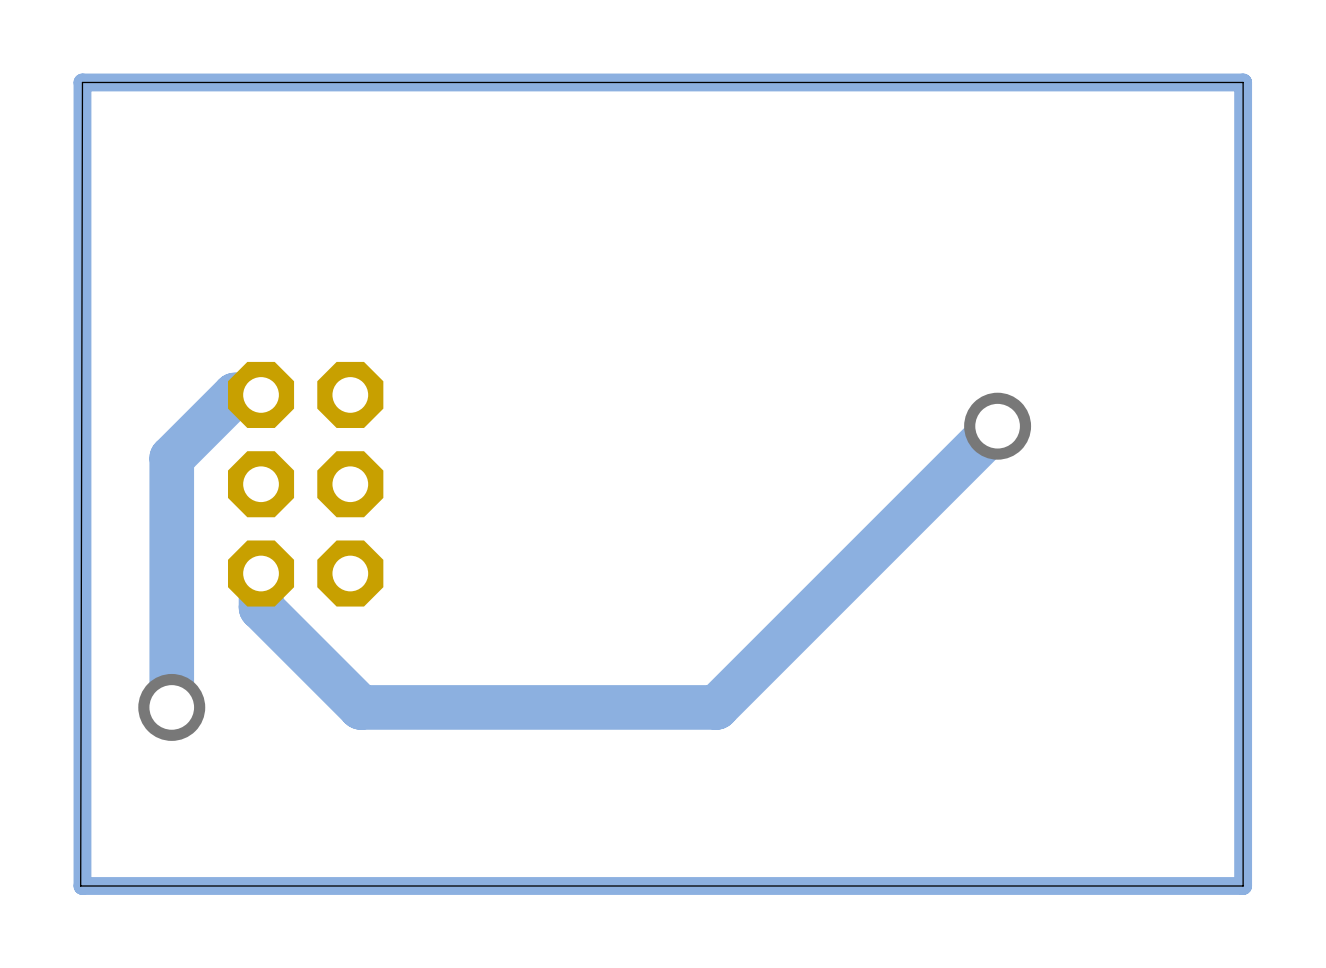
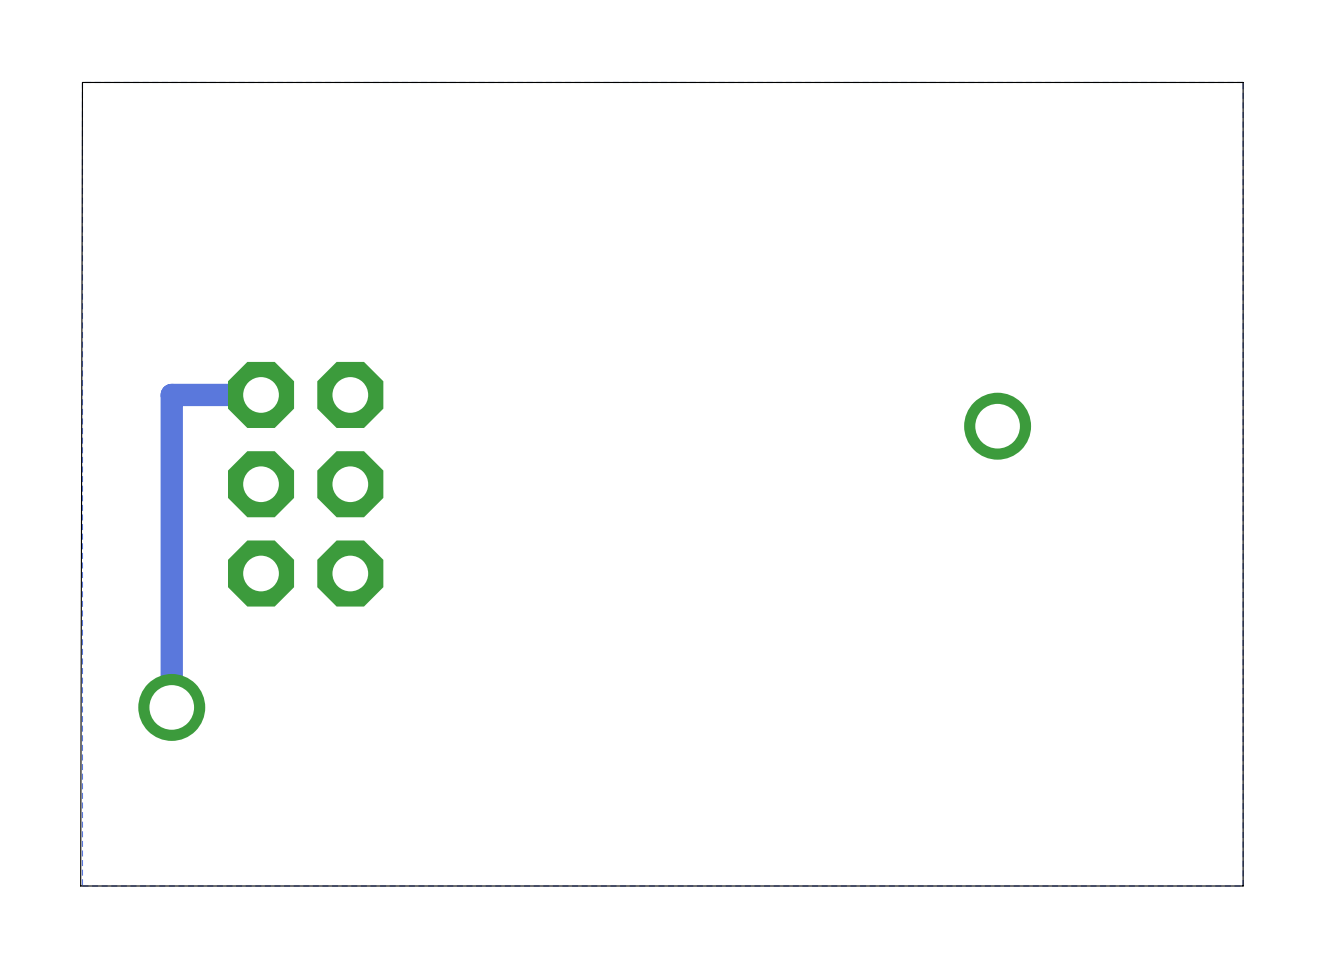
track: (1243, 82) (82, 82) (82, 886) (1243, 886) (1243, 82) -> none
track: (234, 394) (171, 458) -> (234, 394) (171, 394) (171, 458)
track: (997, 426) (716, 707) (360, 707) (261, 607) (261, 573) -> none
track width: thick (171, 458) (171, 707) -> thin (171, 458) (171, 707)

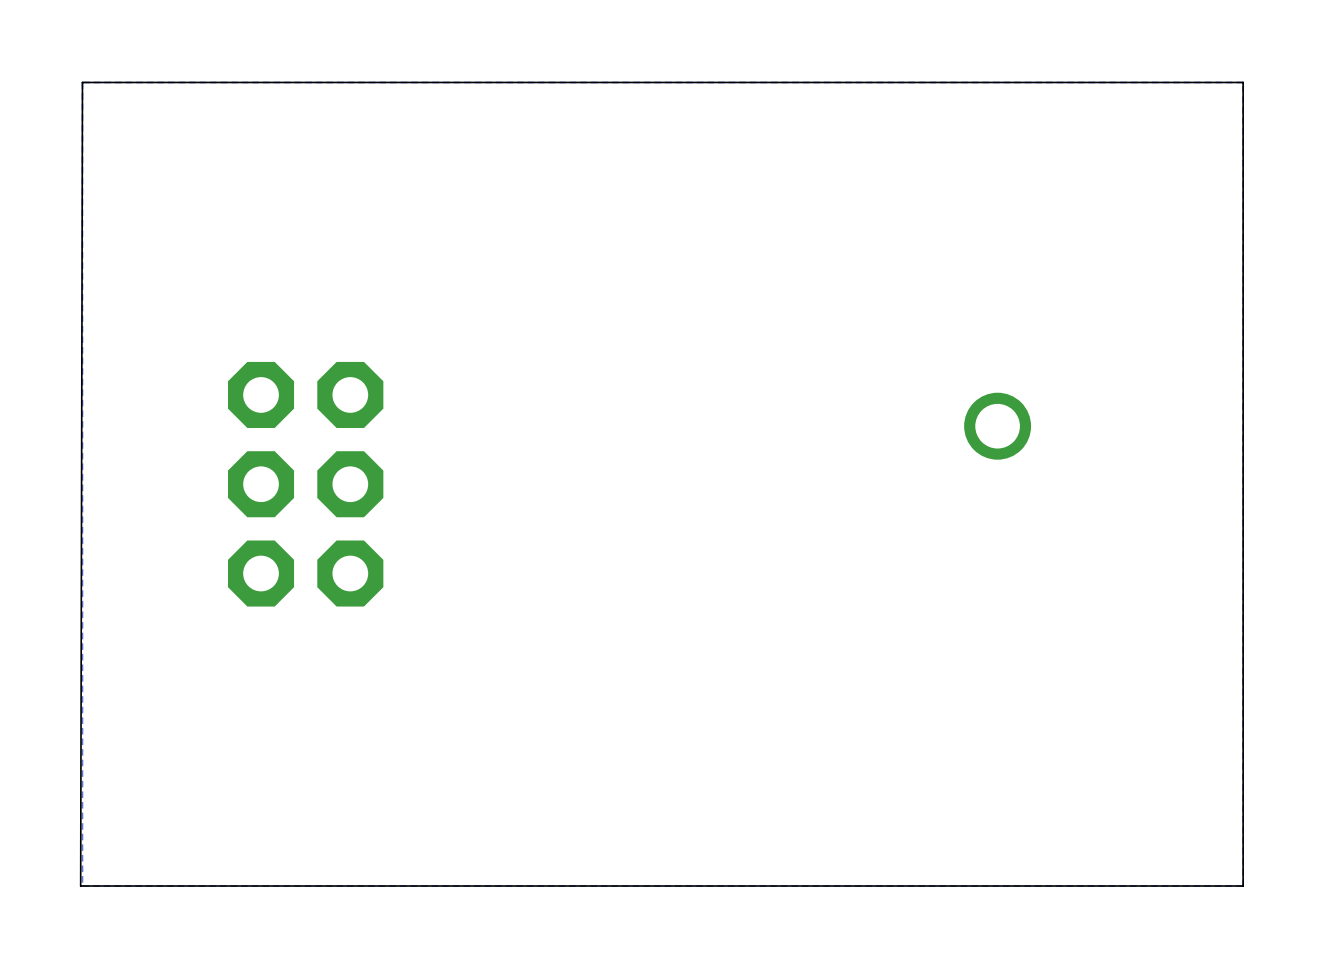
track: (261, 394) (171, 394) (171, 707) -> none
via: (171, 707) -> none

